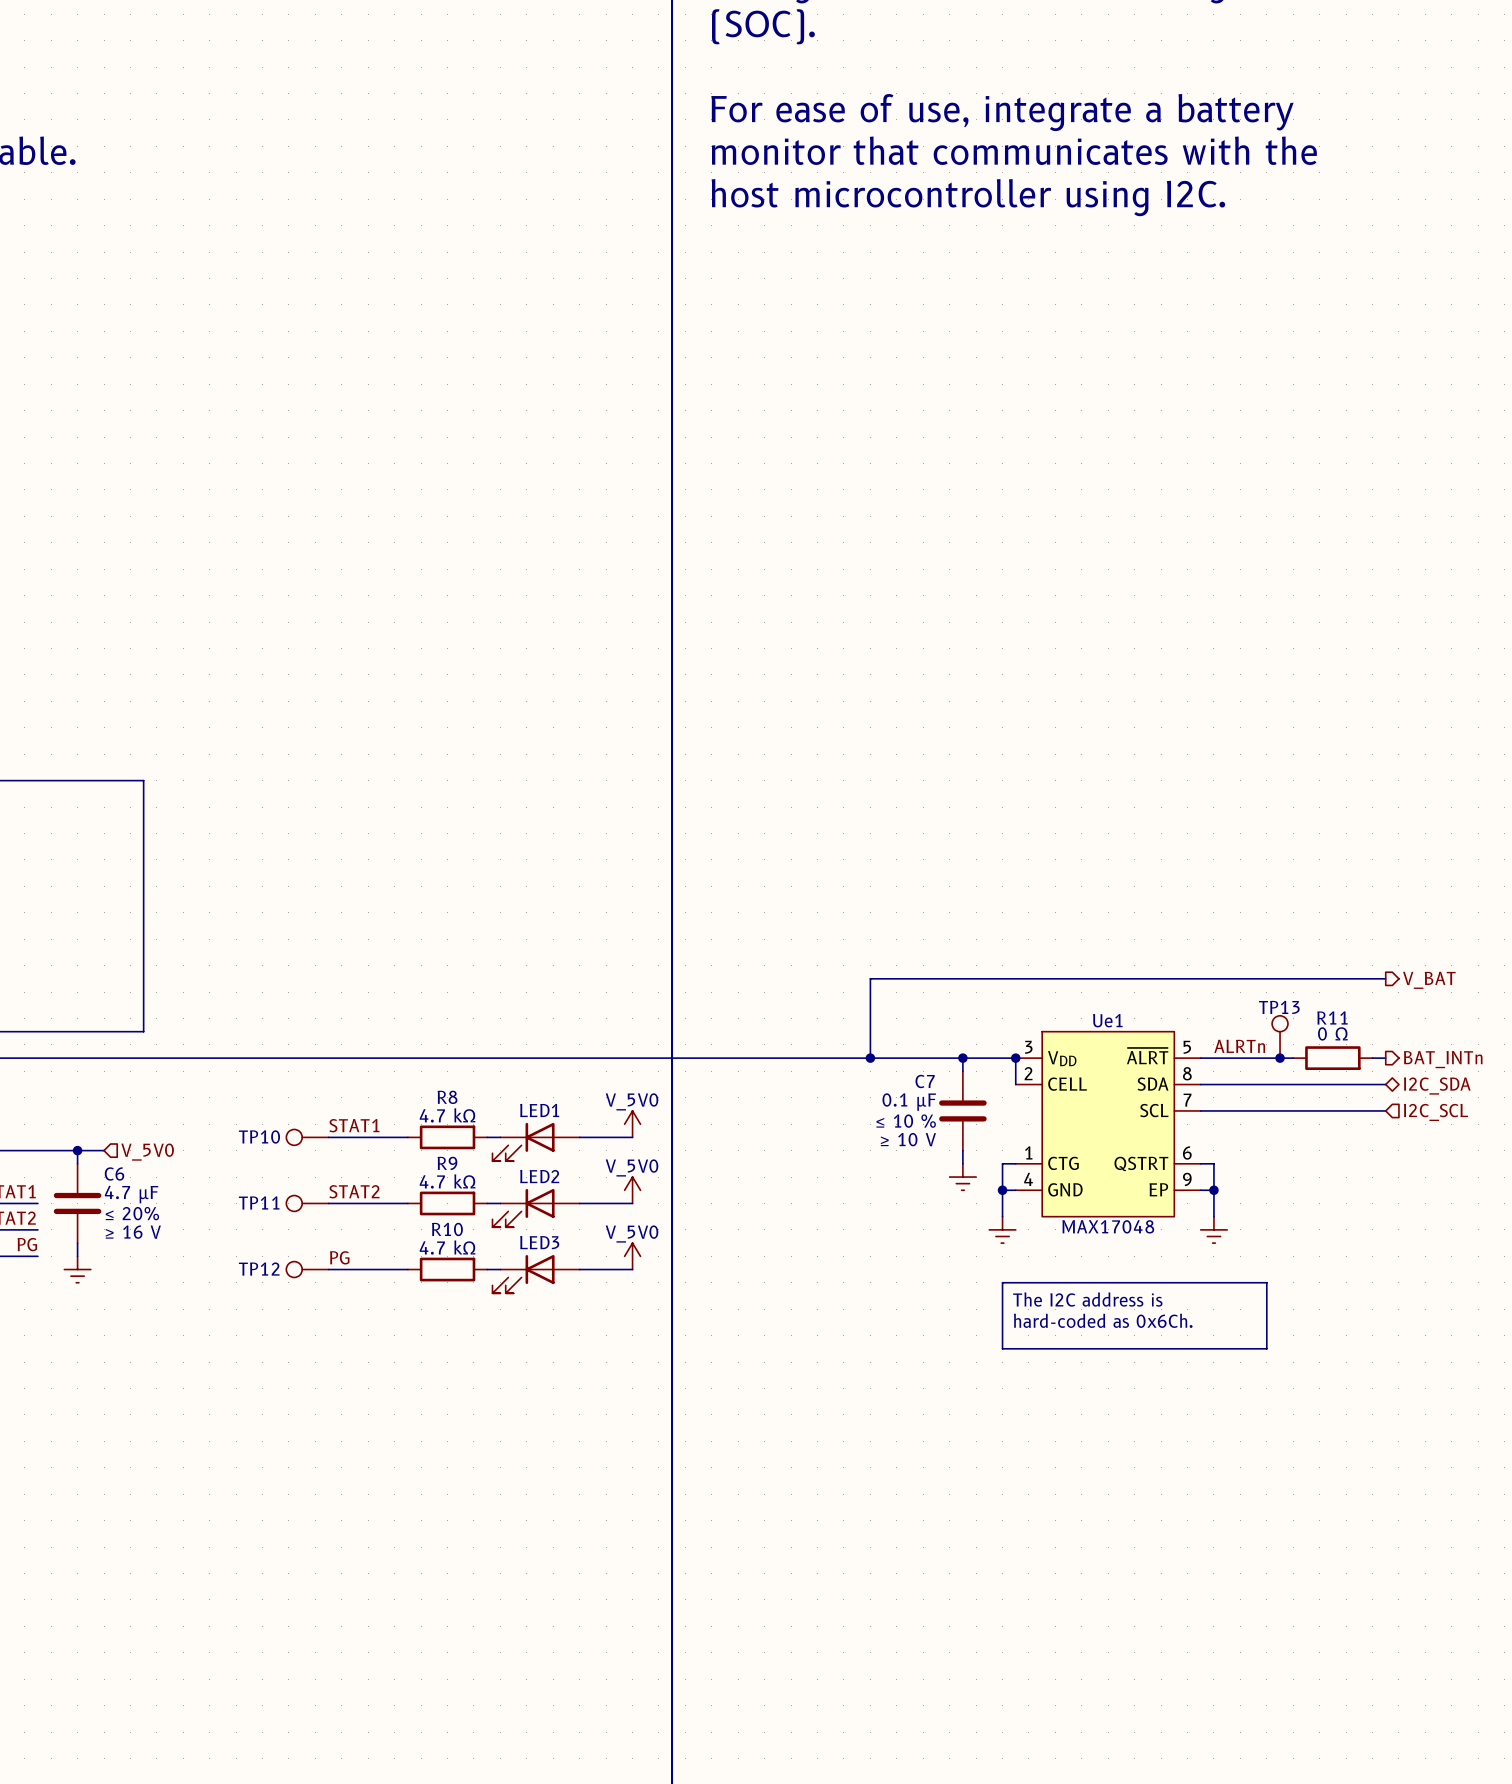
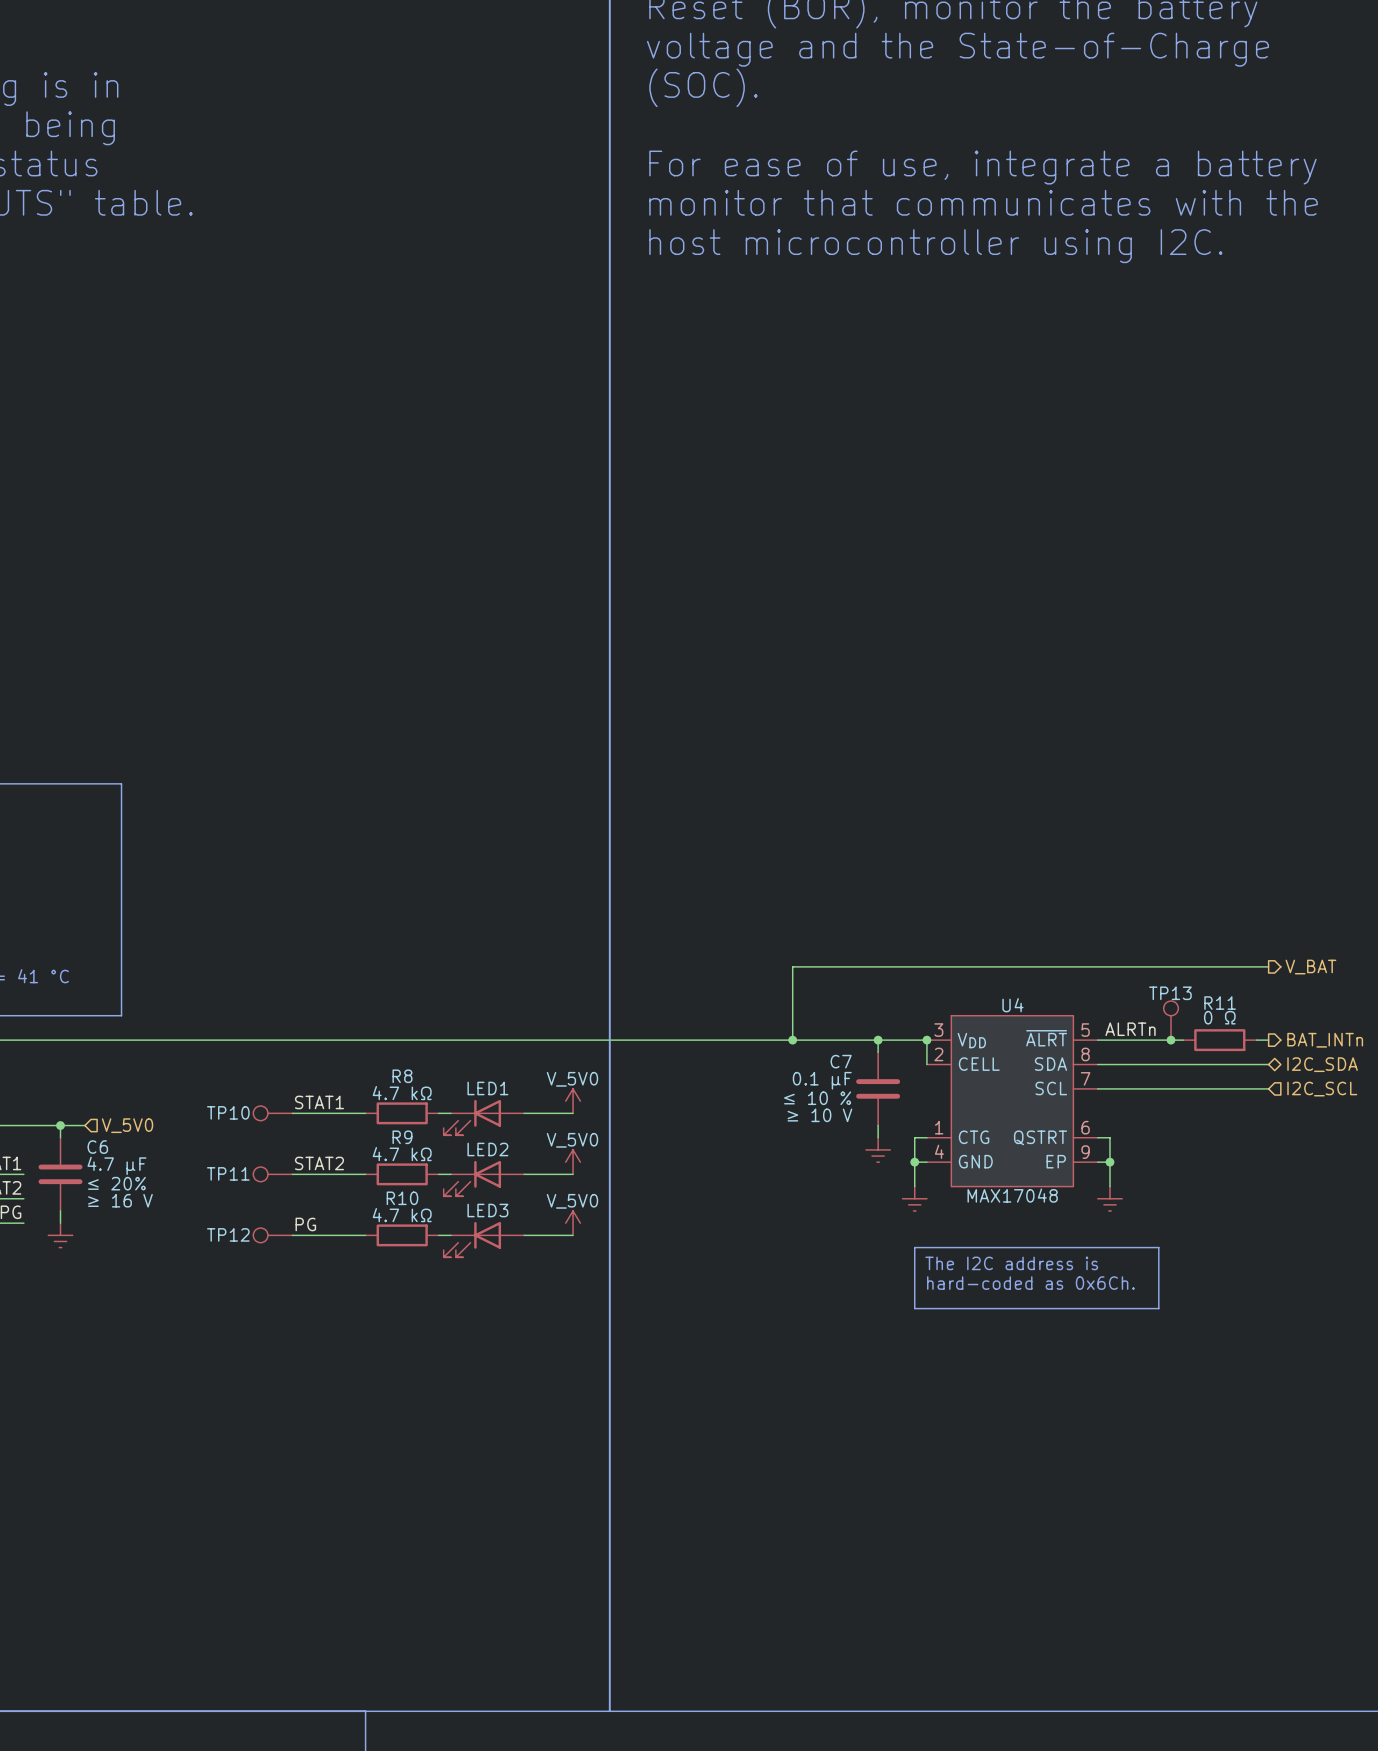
Ue1 name: Ue1 (1107, 1020) -> U4 (1012, 1005)

